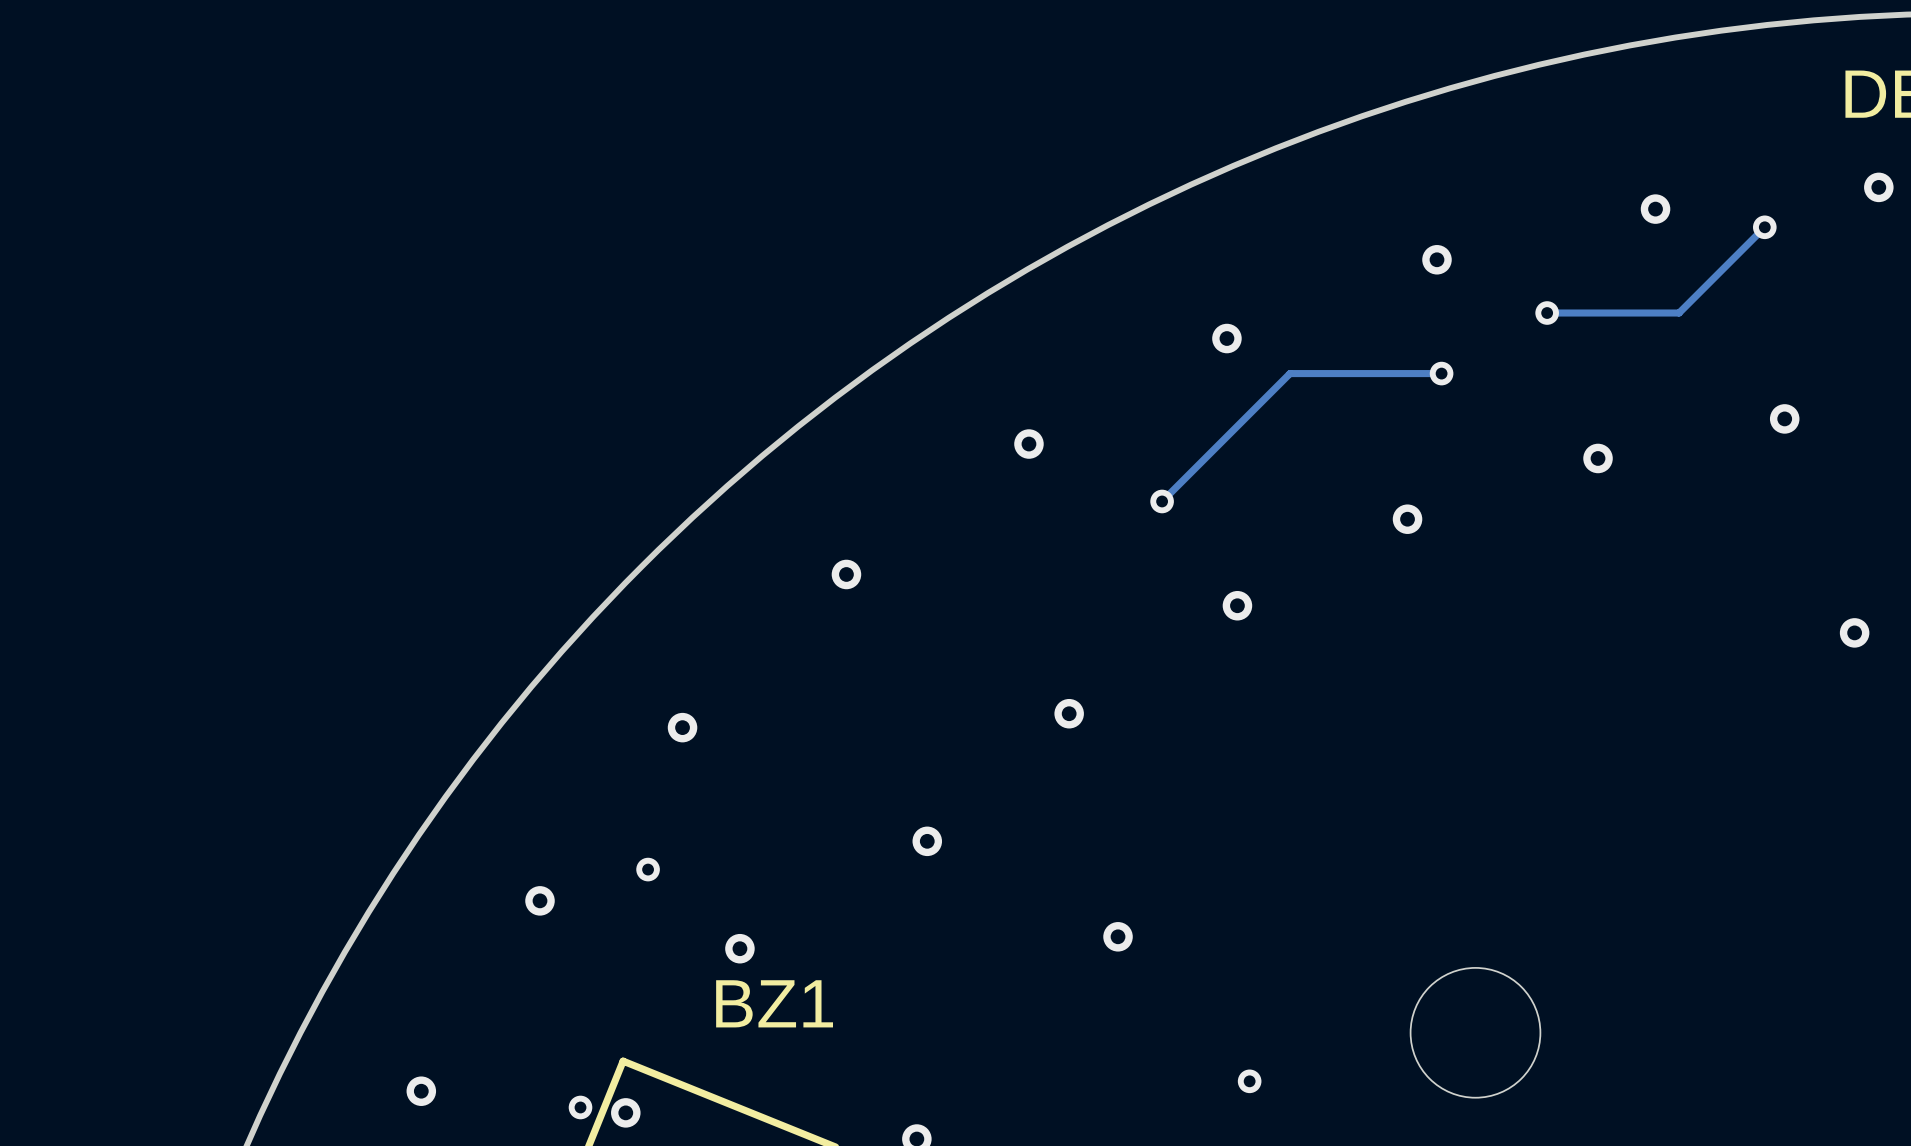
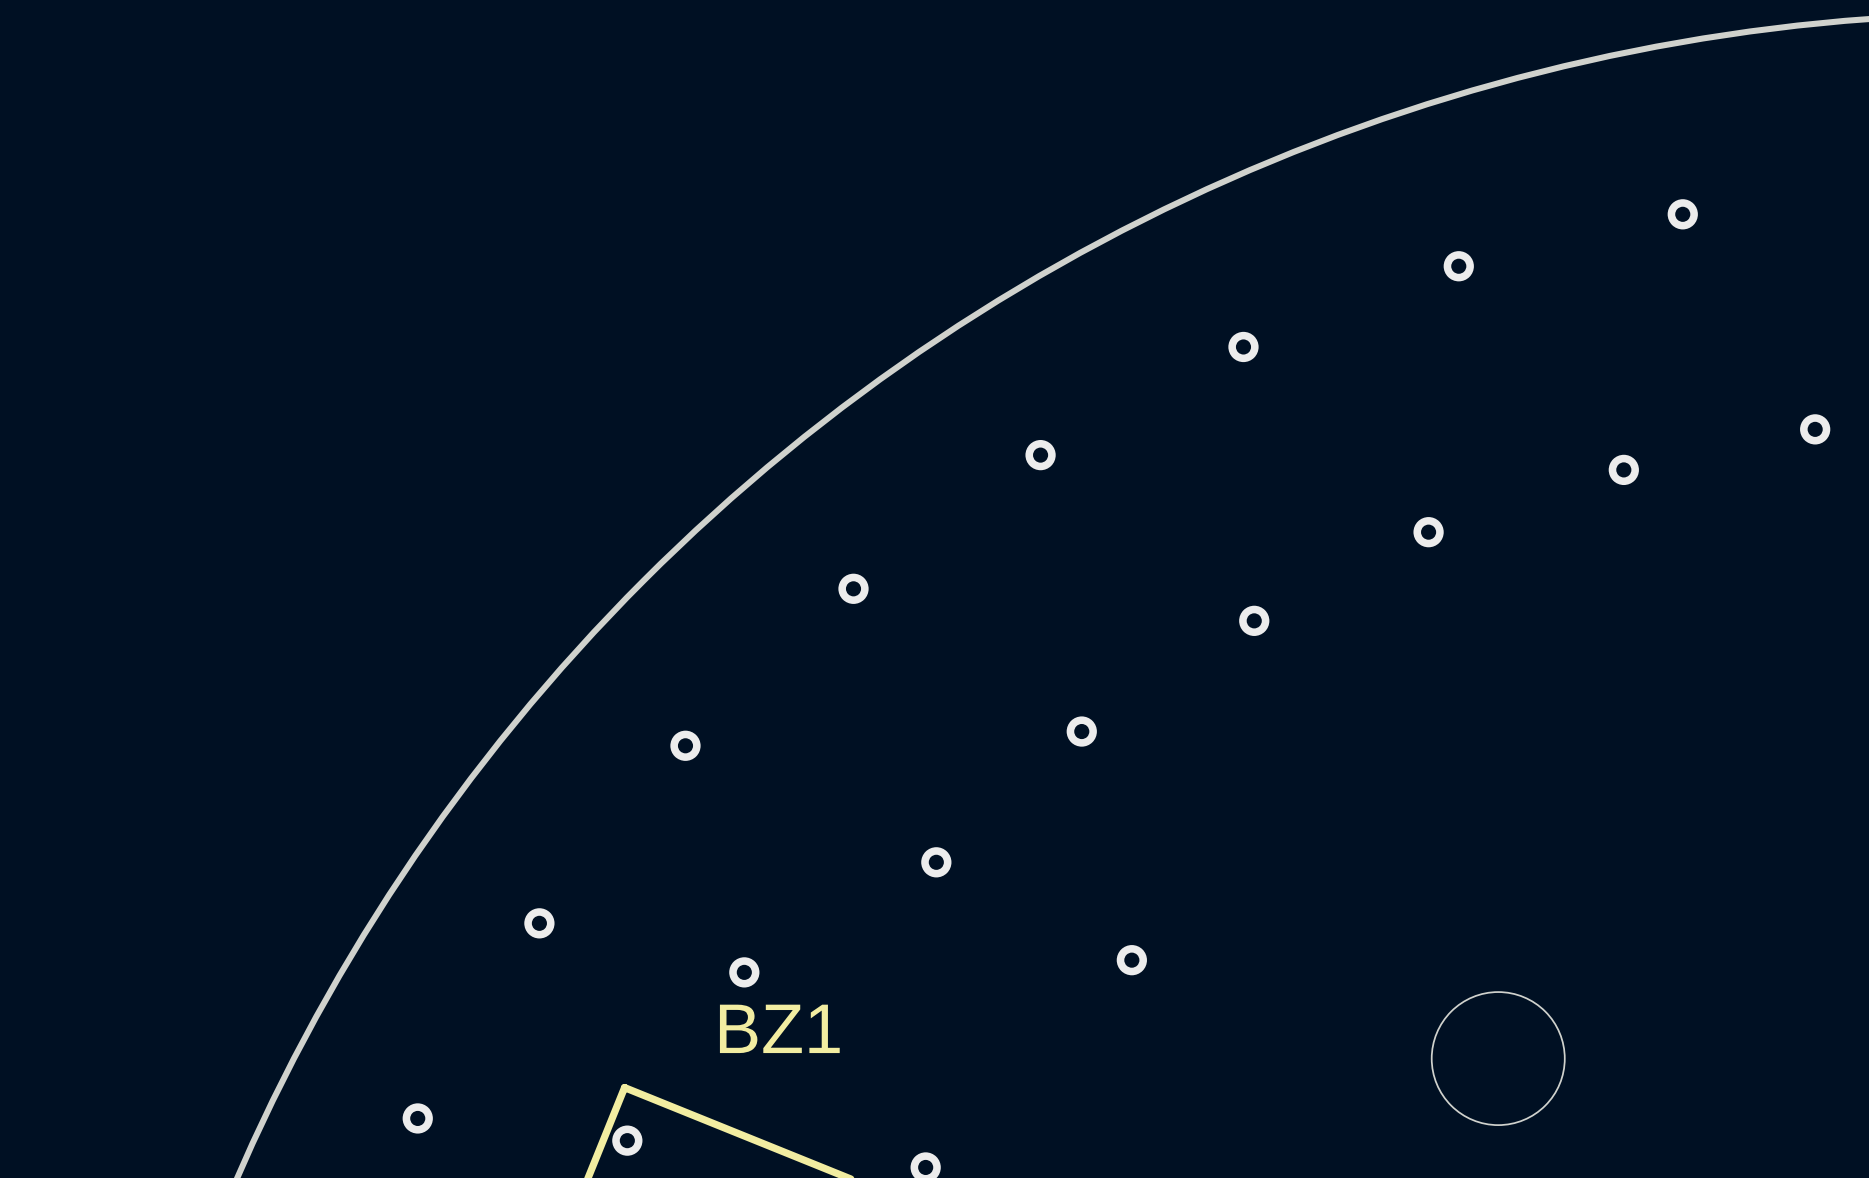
track: (1764, 227) (1679, 313) (1547, 313) -> none
via: (1764, 227) -> none
via: (1547, 313) -> none
track: (1441, 373) (1290, 373) (1162, 501) -> none
via: (1441, 373) -> none
via: (1162, 501) -> none
via: (648, 869) -> none
via: (1249, 1081) -> none
via: (580, 1107) -> none

